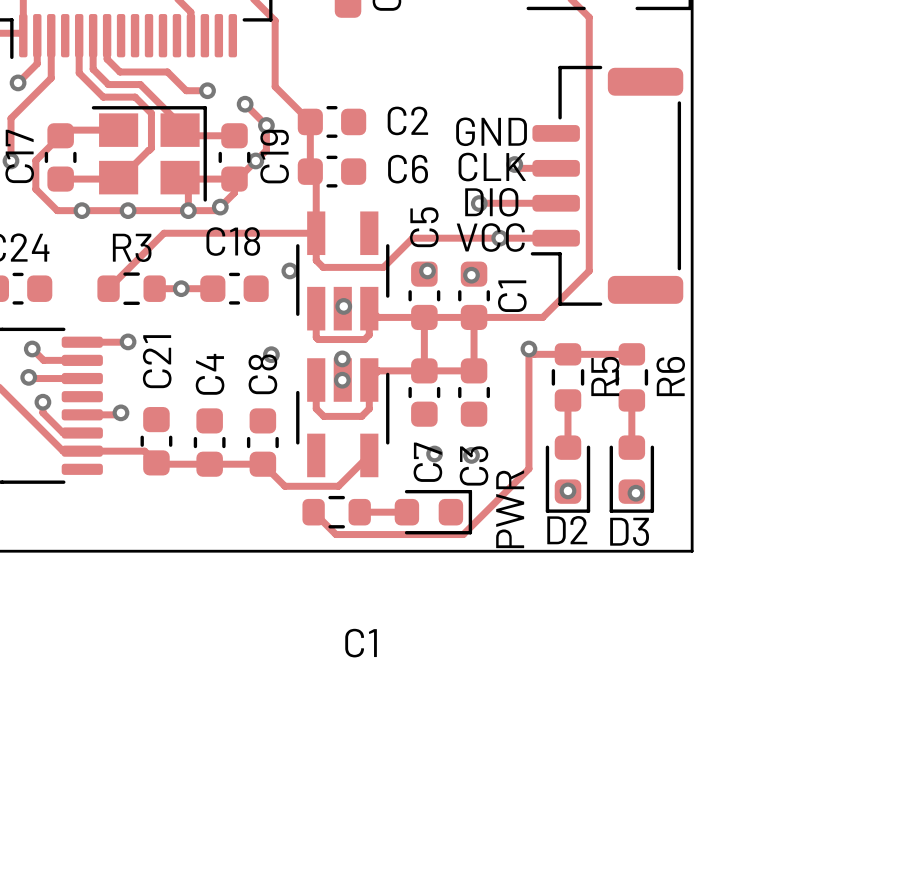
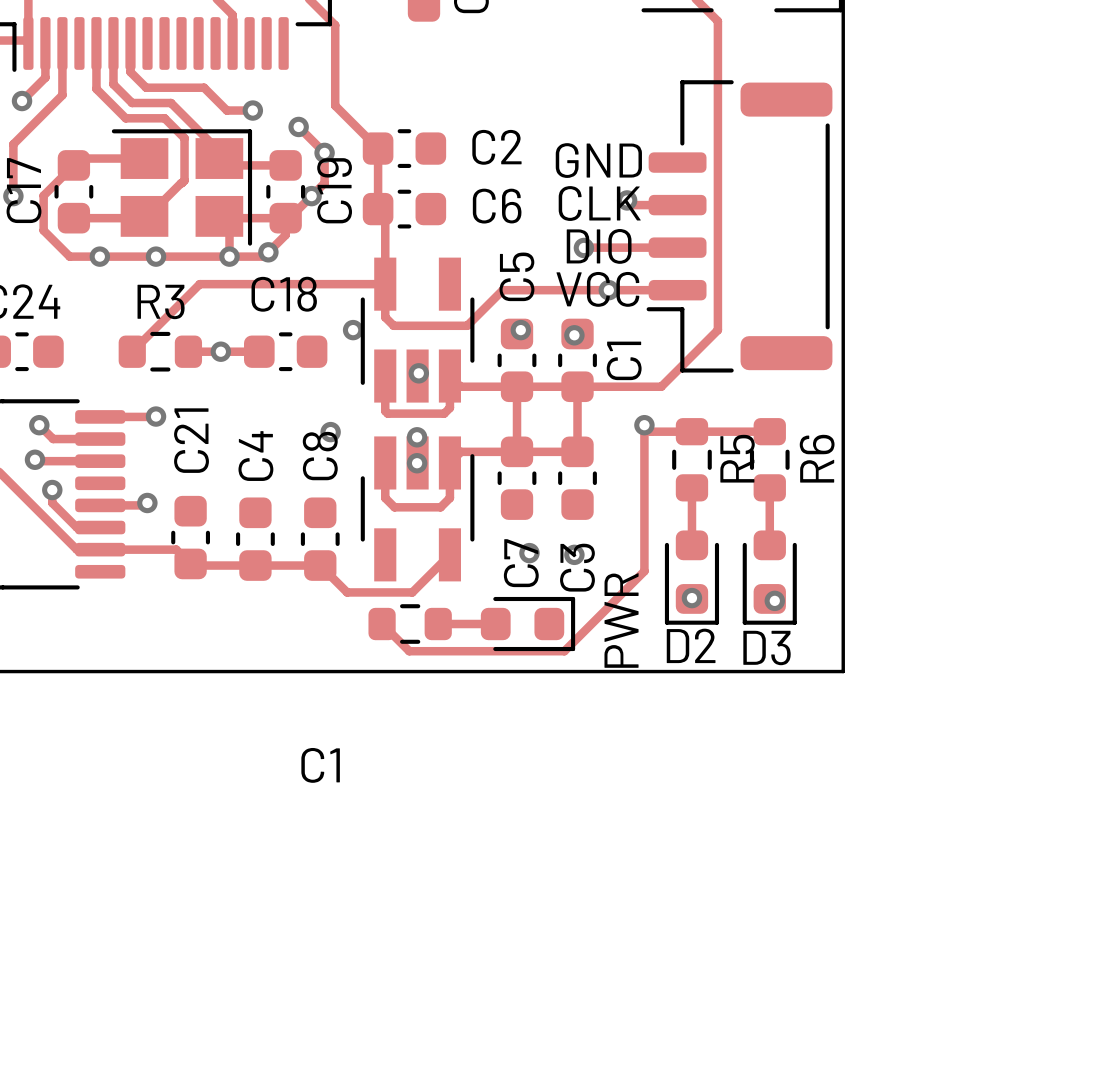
text position: C1 (361, 643) -> C1 (320, 765)

